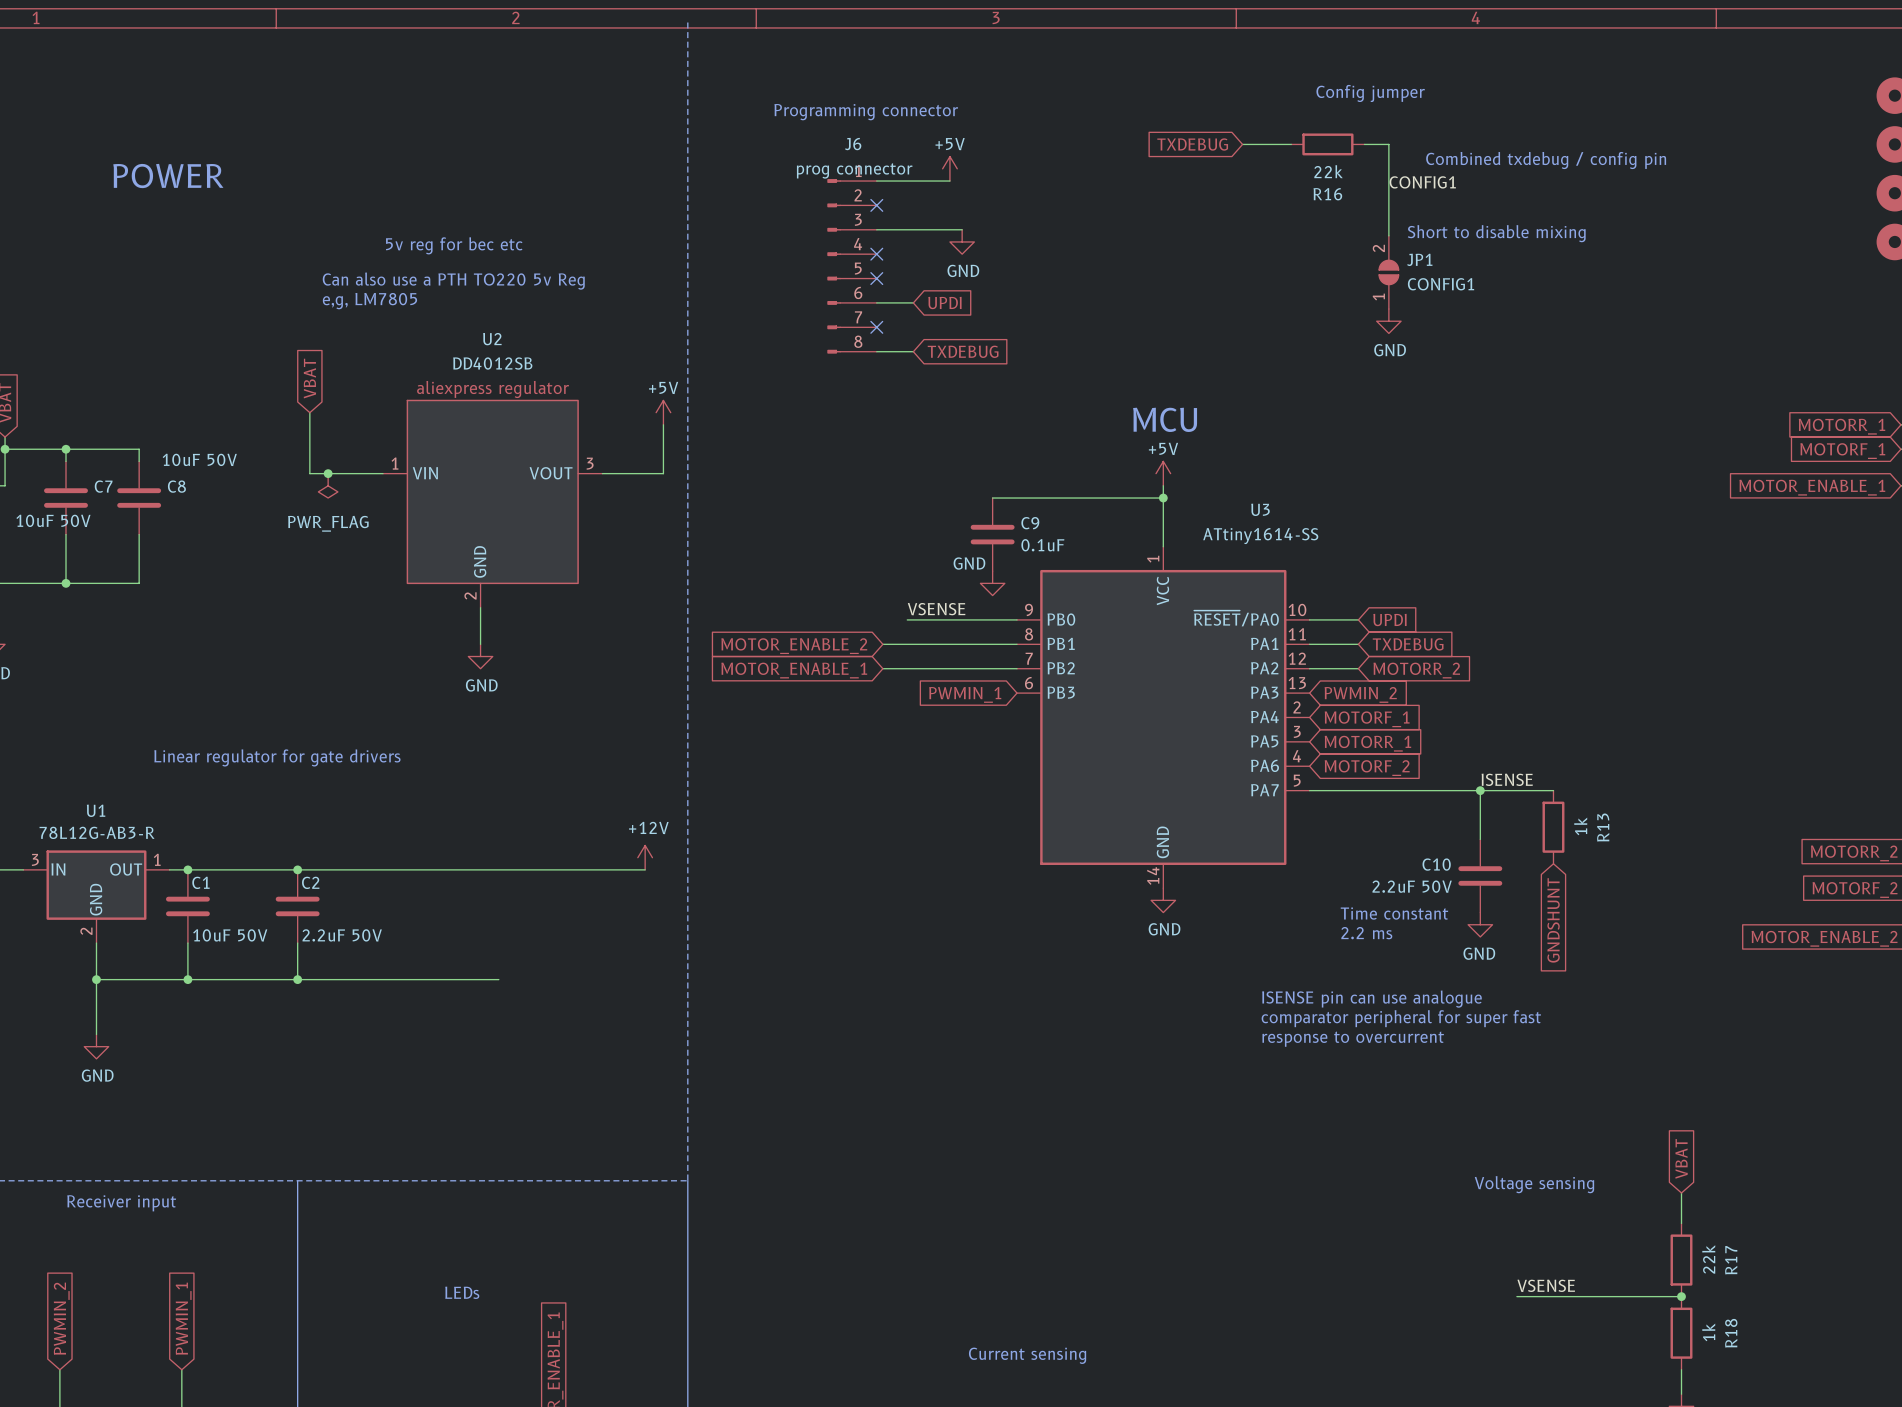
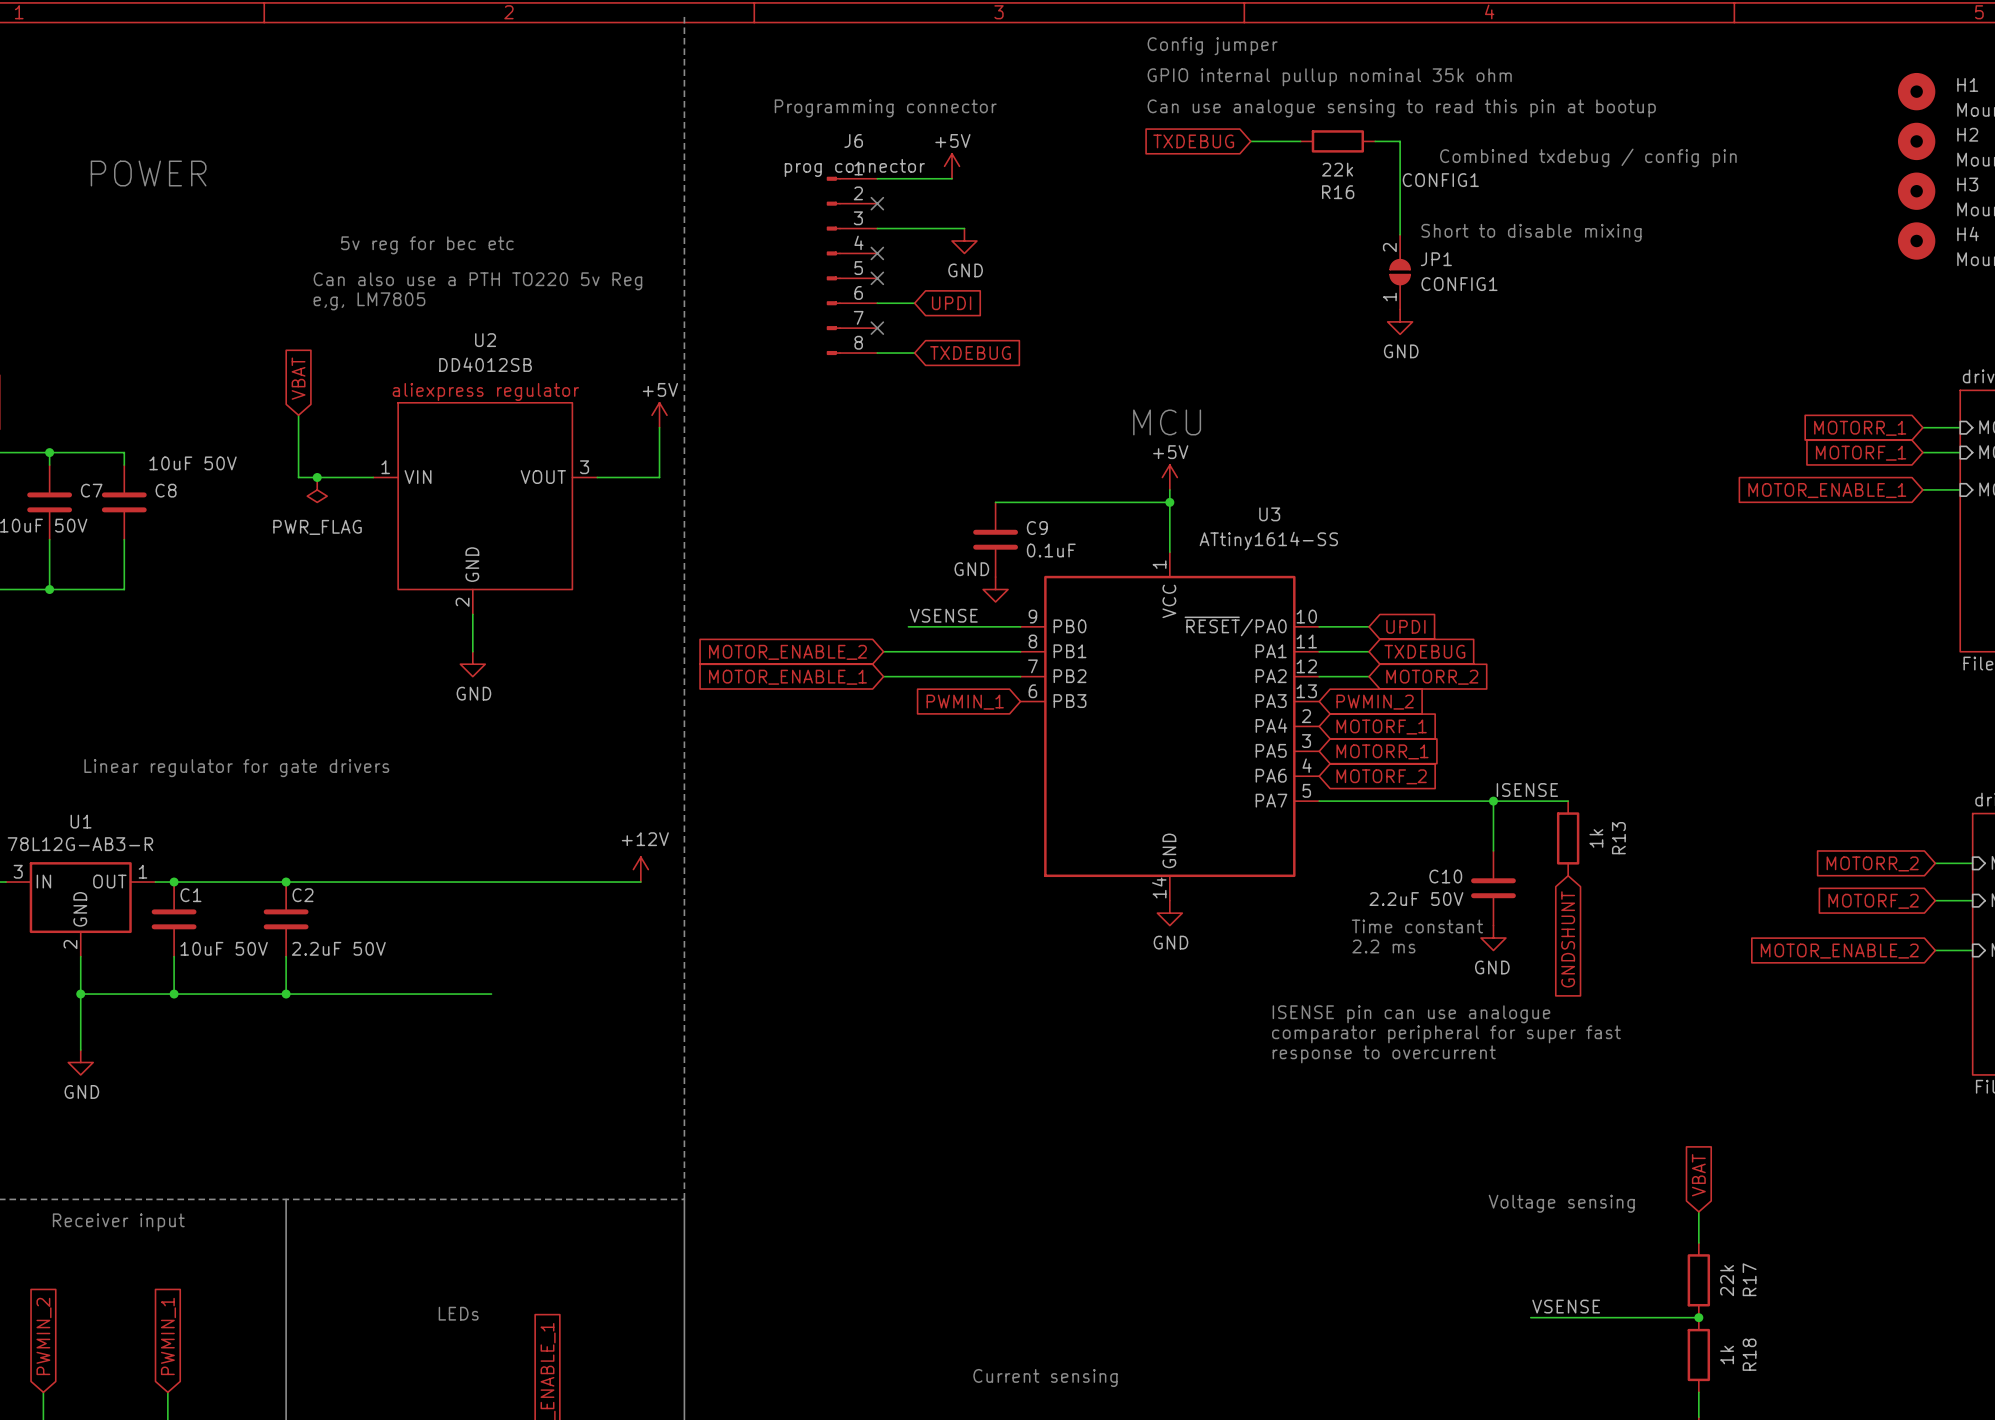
text: none -> GPIO internal pullup nominal 35k ohm (1329, 77)
text position: Config jumper (1370, 93) -> Config jumper (1212, 46)
text: none -> Can use analogue sensing to read this pin at bootup (1401, 108)

